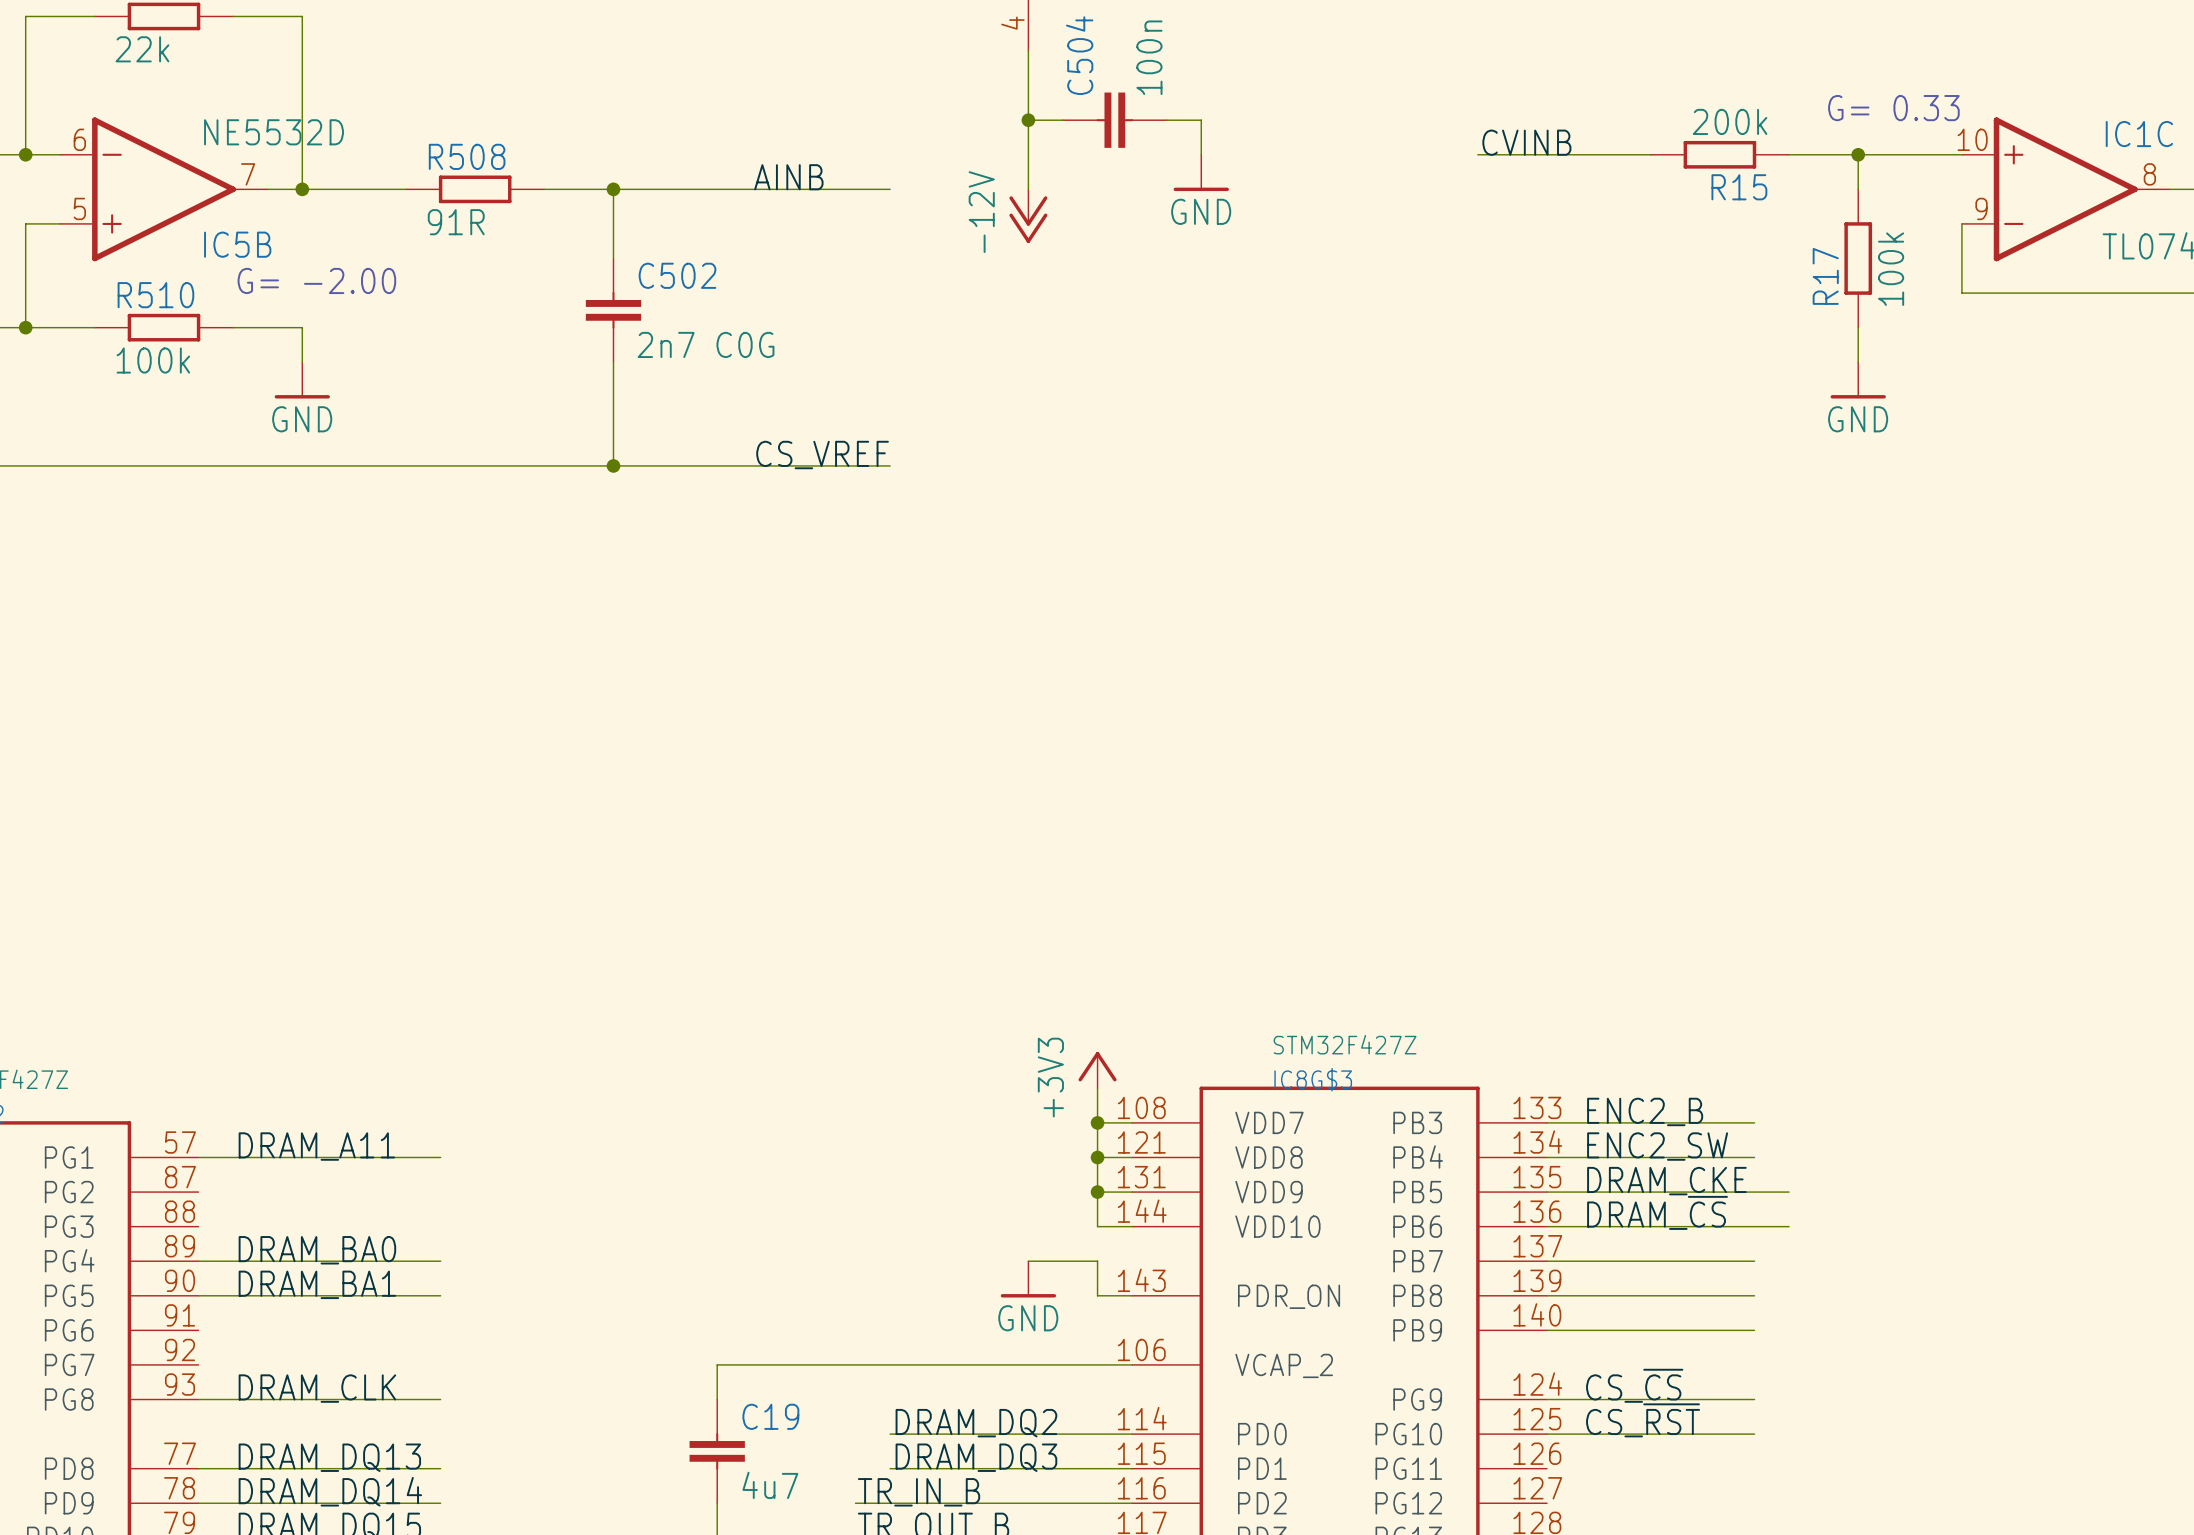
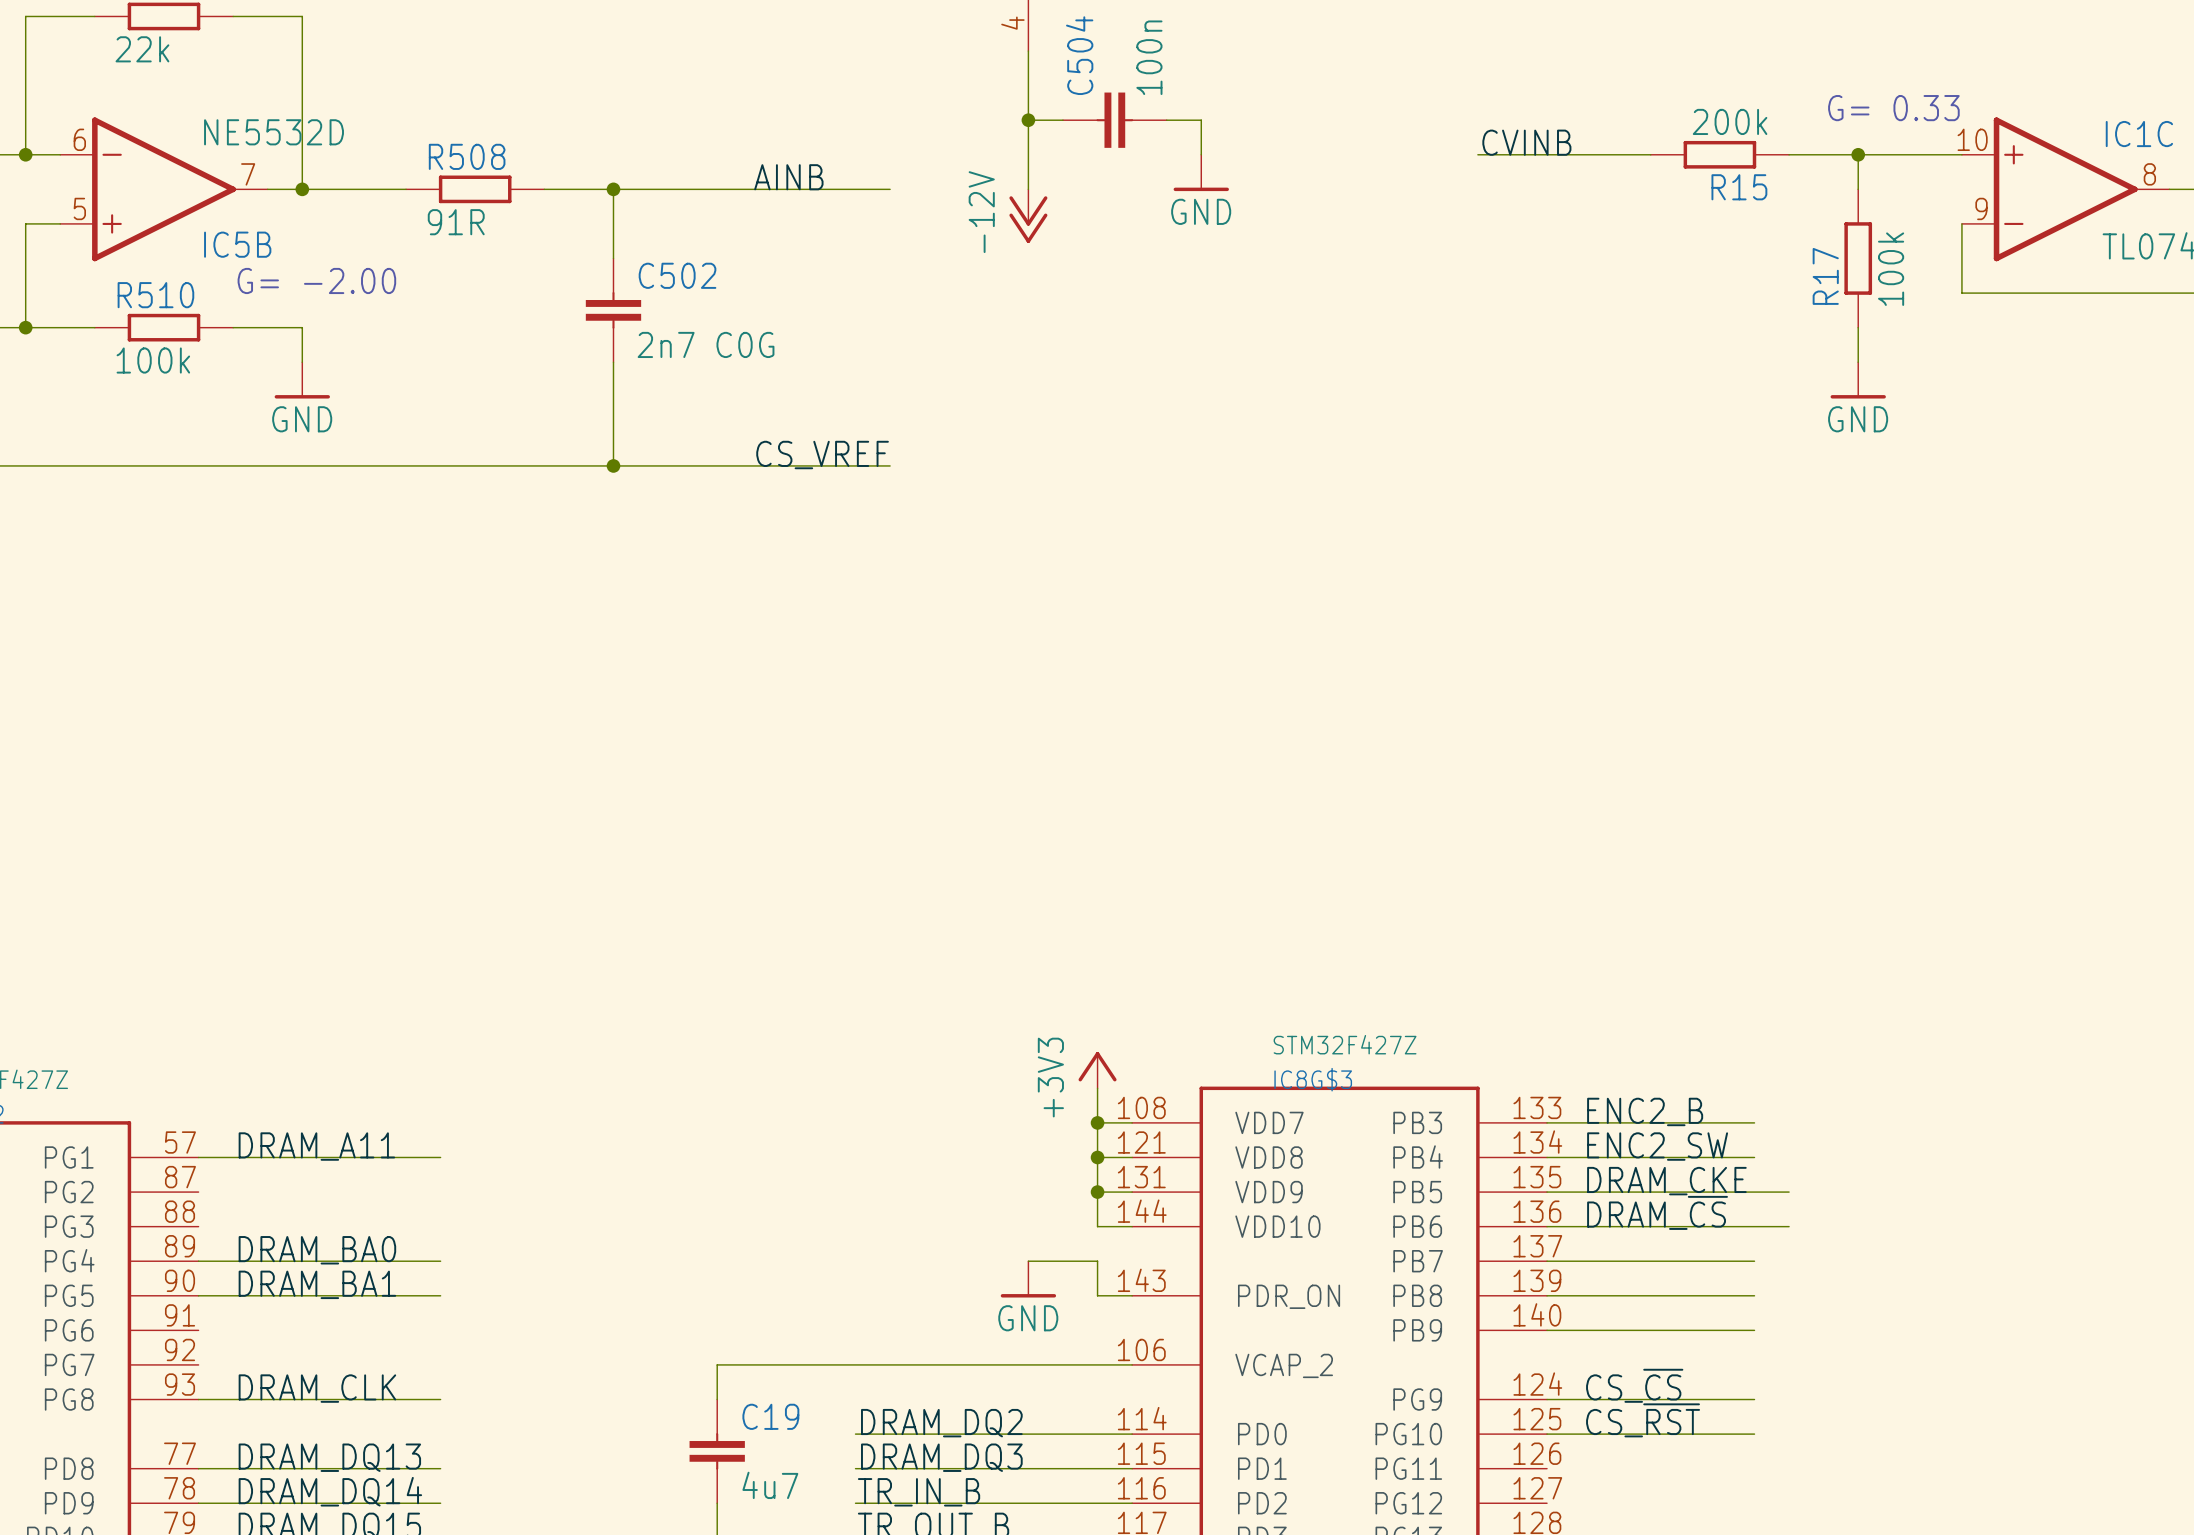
label position: DRAM_DQ2 (976, 1423) -> DRAM_DQ2 (941, 1423)
wire: none -> (855, 1434) (890, 1434)
label position: DRAM_DQ3 (976, 1457) -> DRAM_DQ3 (941, 1457)
wire: none -> (855, 1468) (890, 1468)

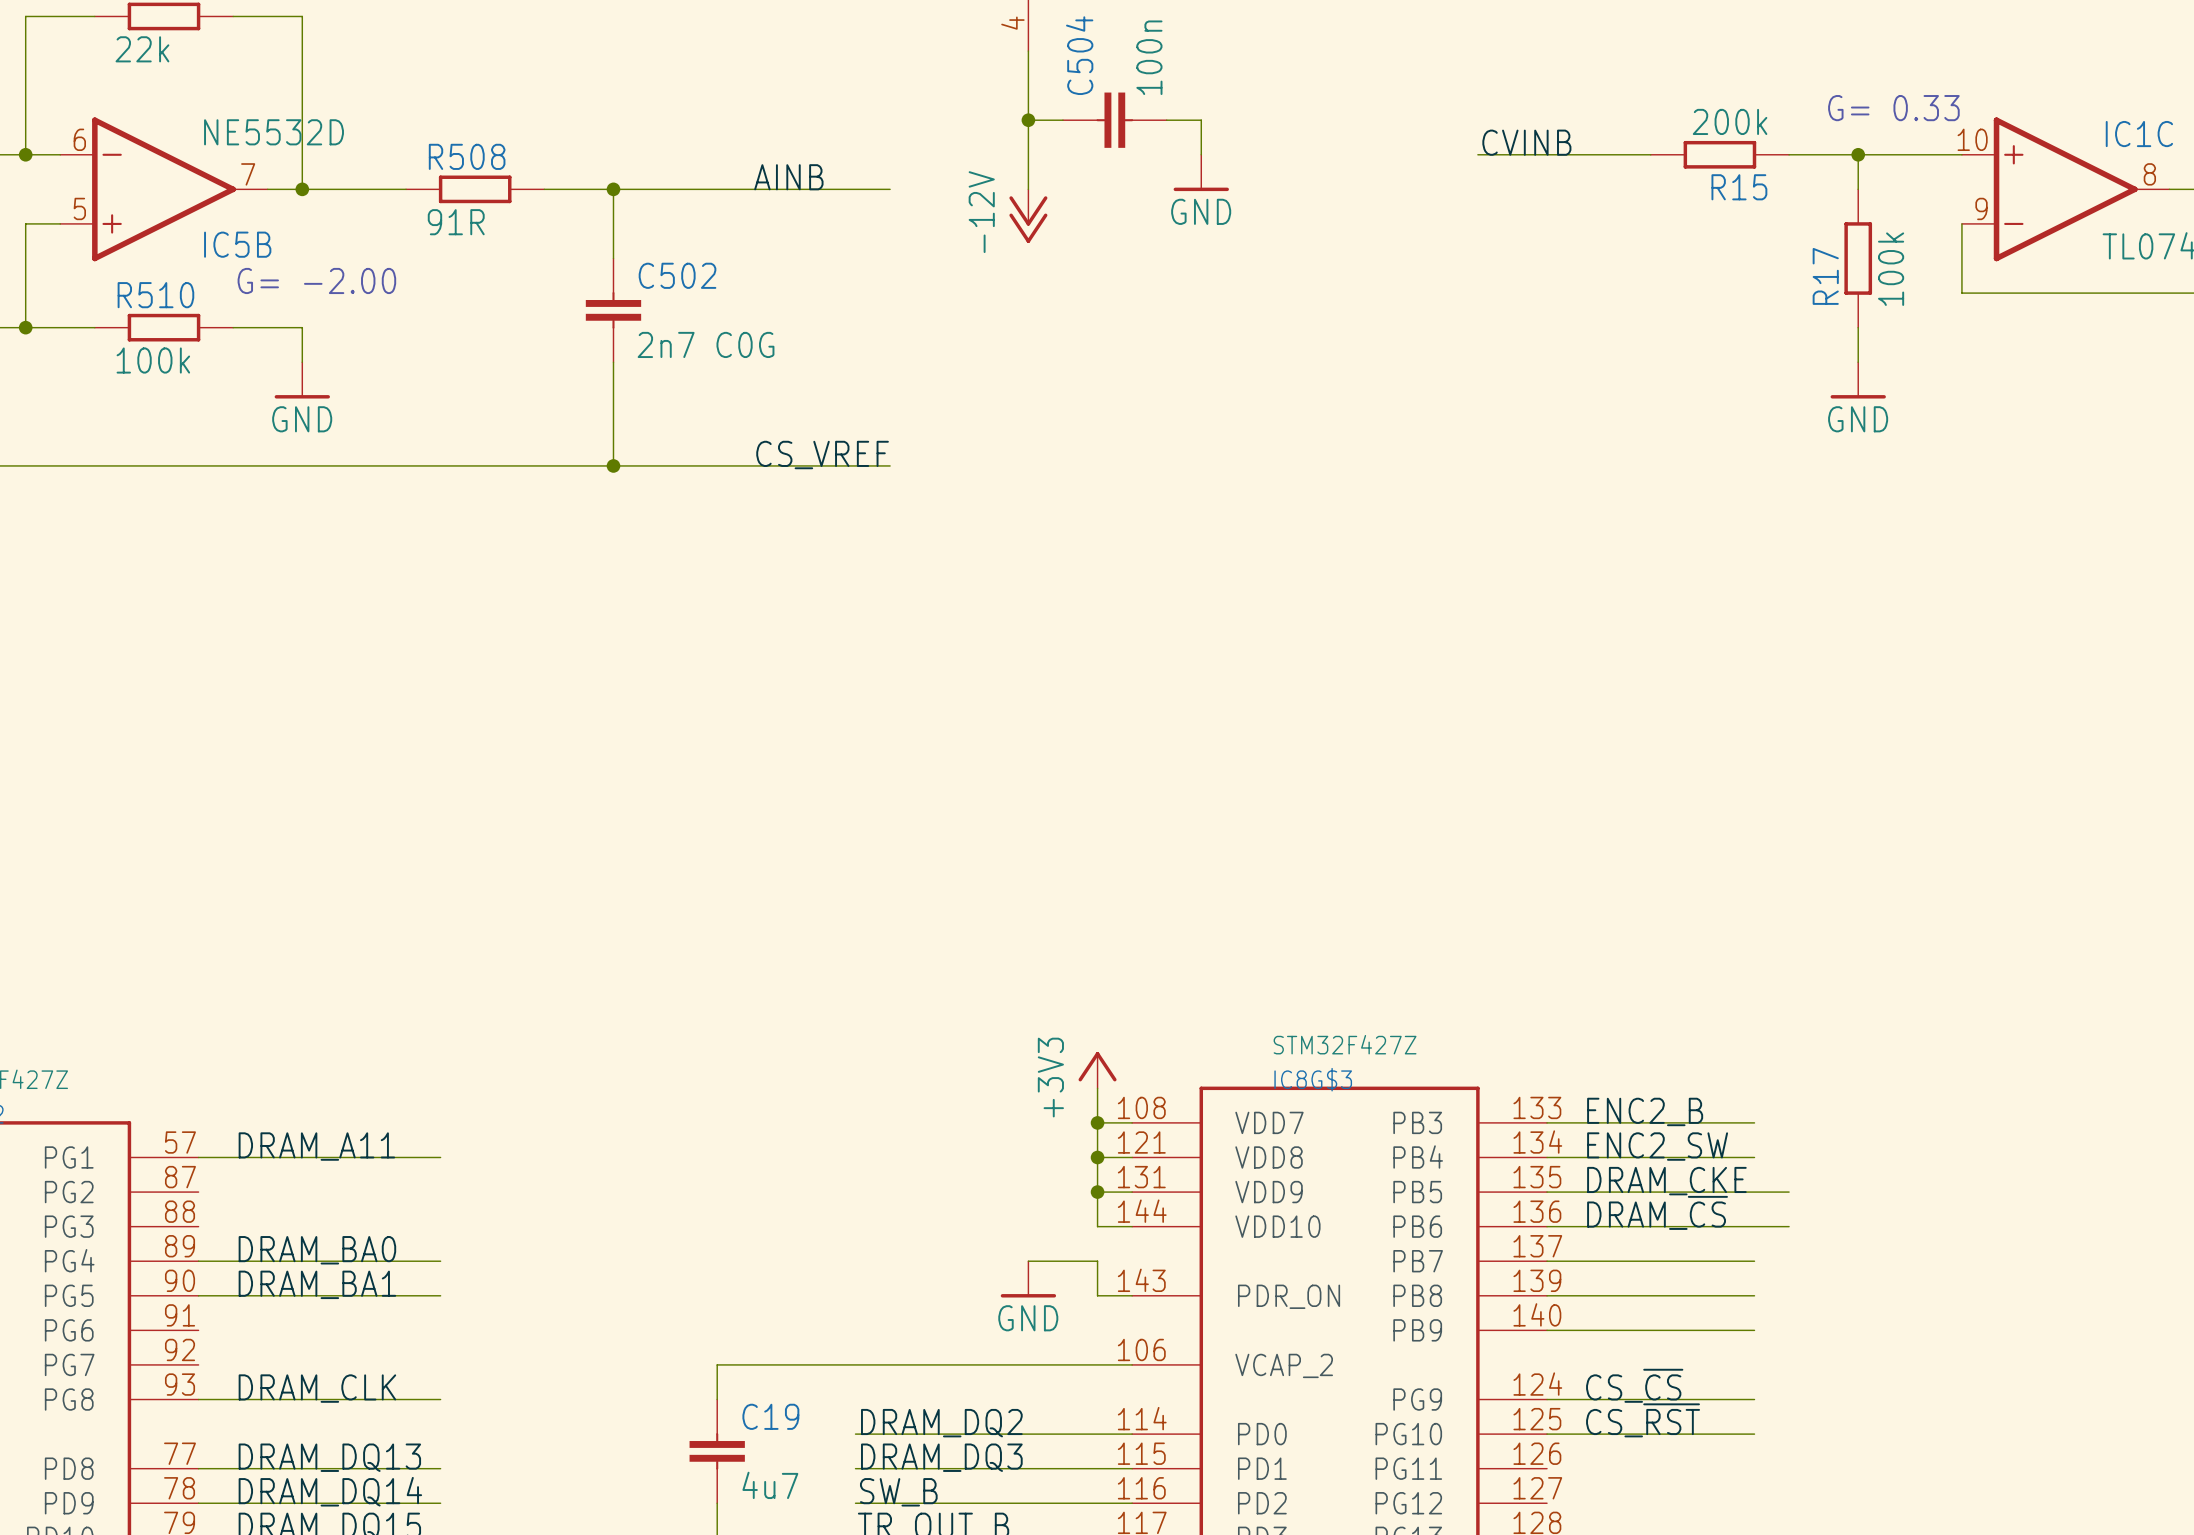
label: TR_IN_B (919, 1492) -> SW_B (898, 1492)

